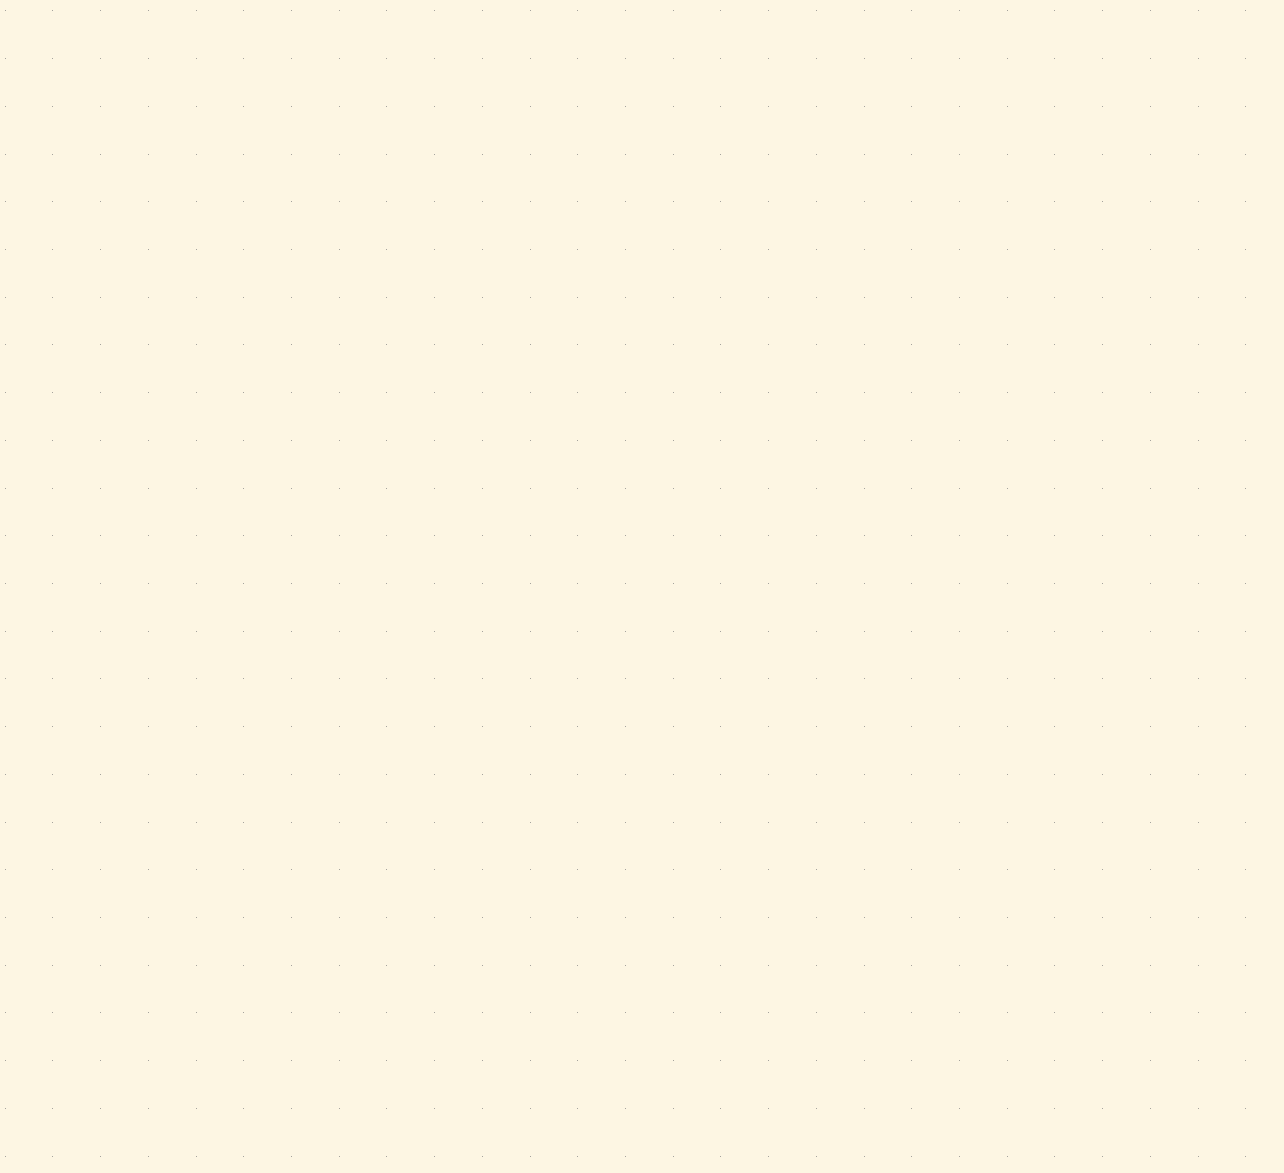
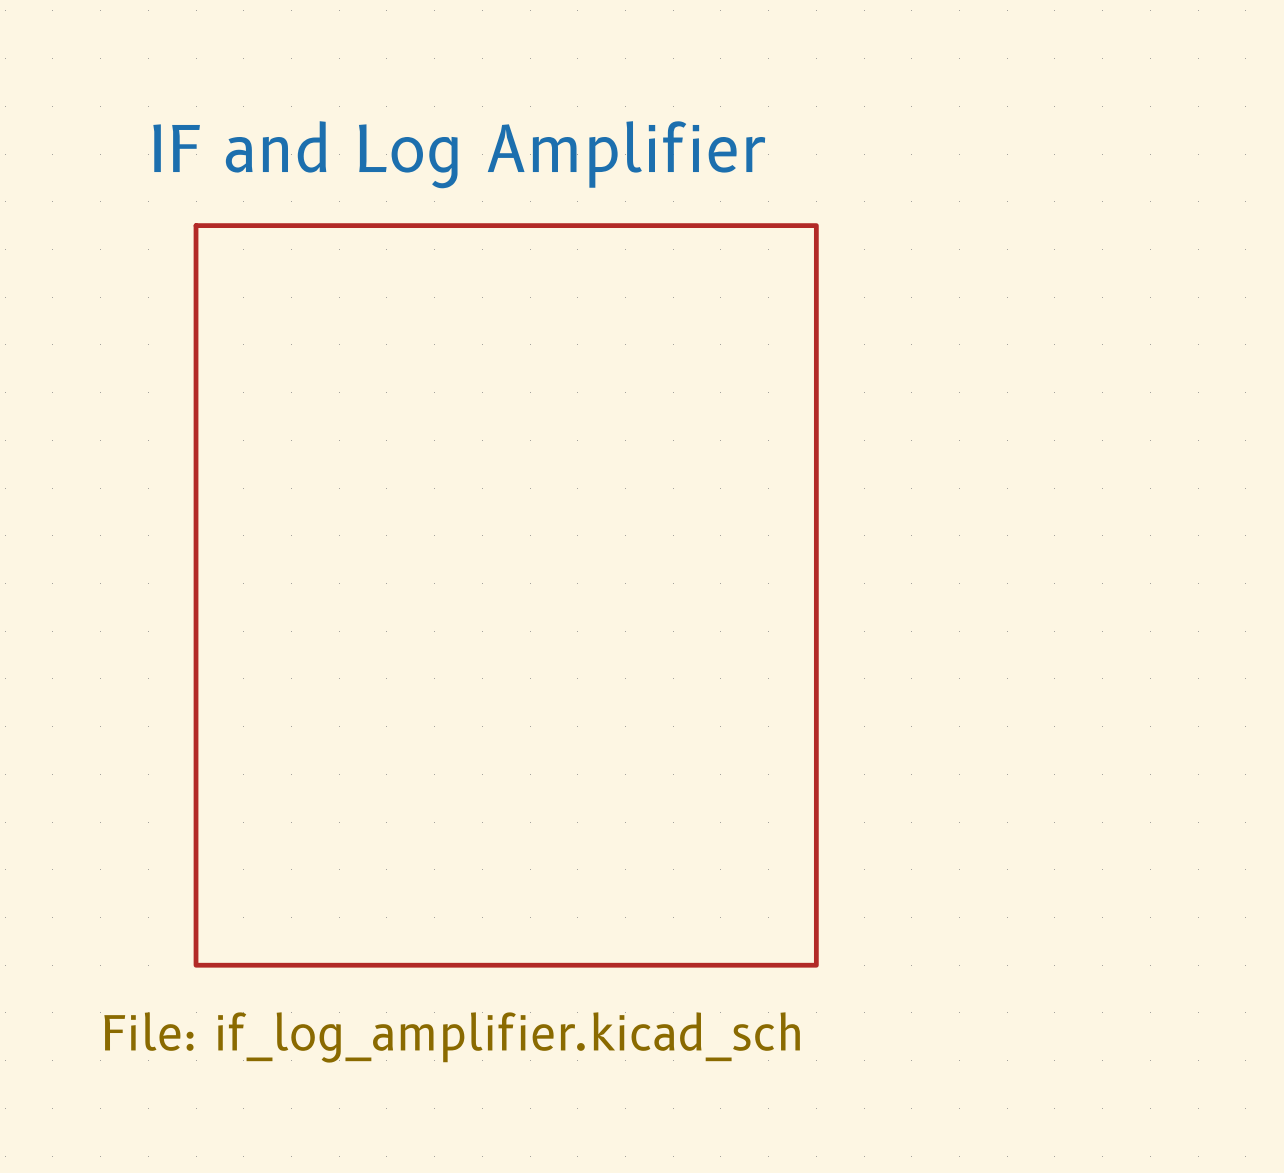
sheet IF and Log Amplifier: none -> File: if_log_amplifier.kicad_sch (506, 595)

